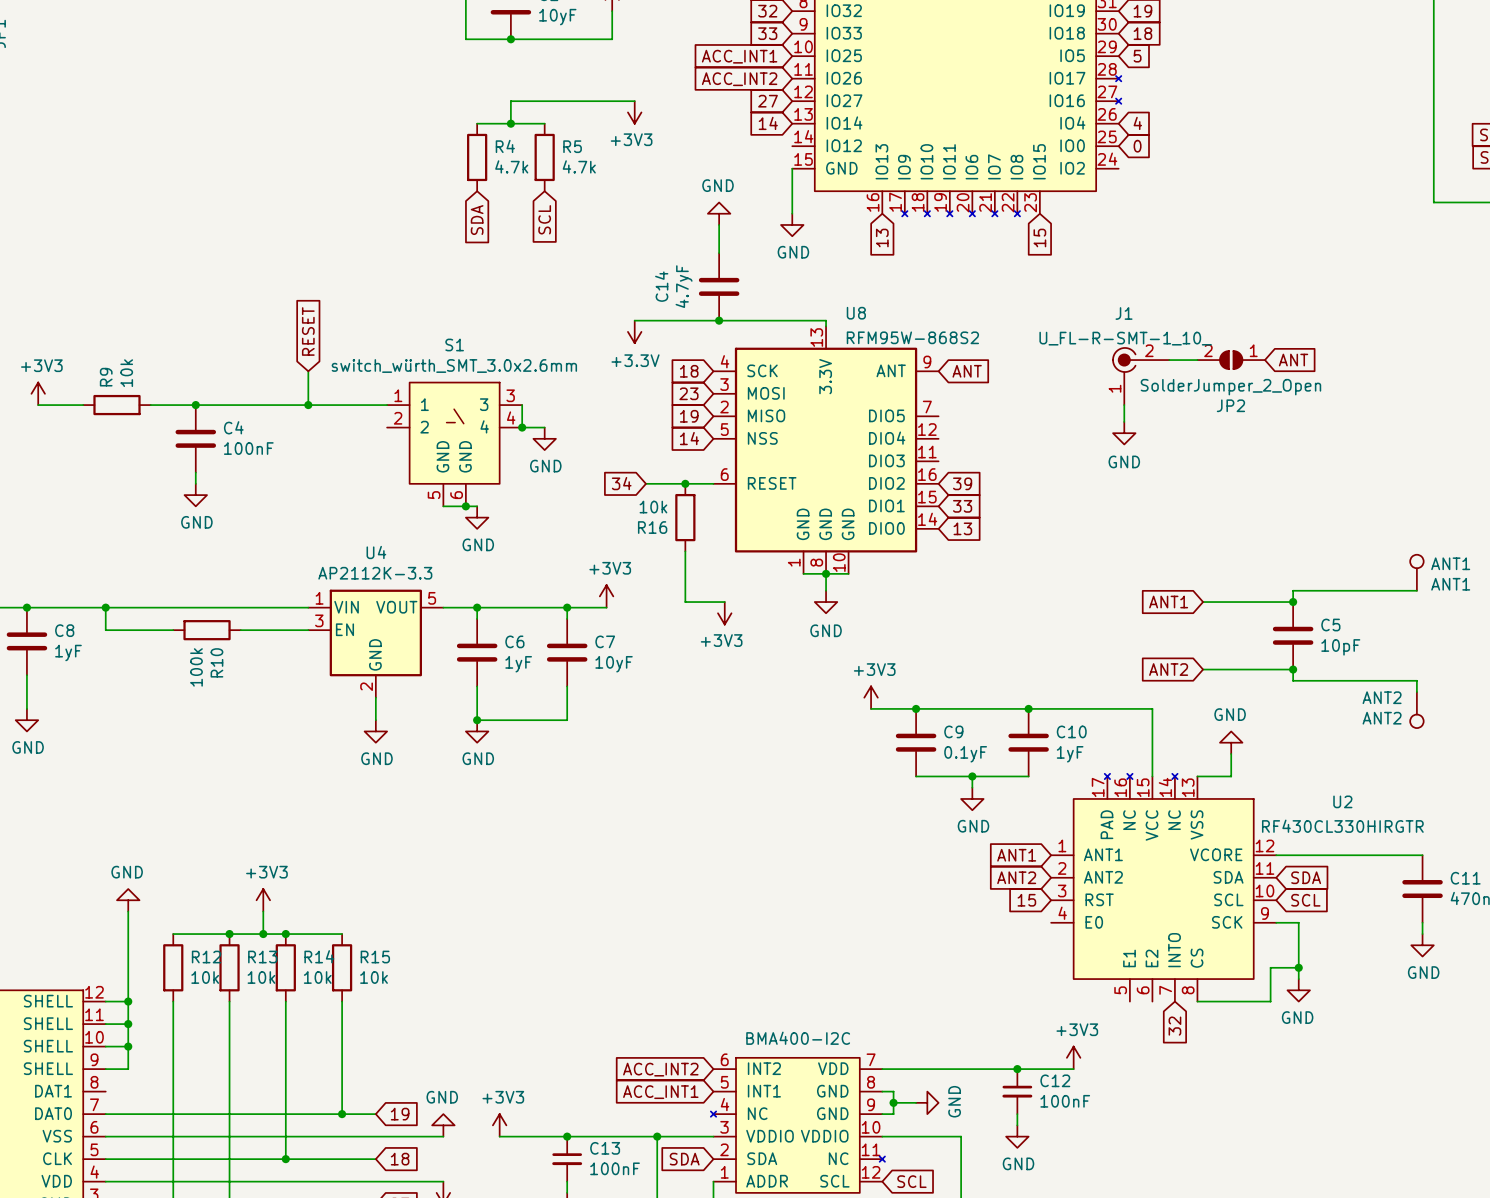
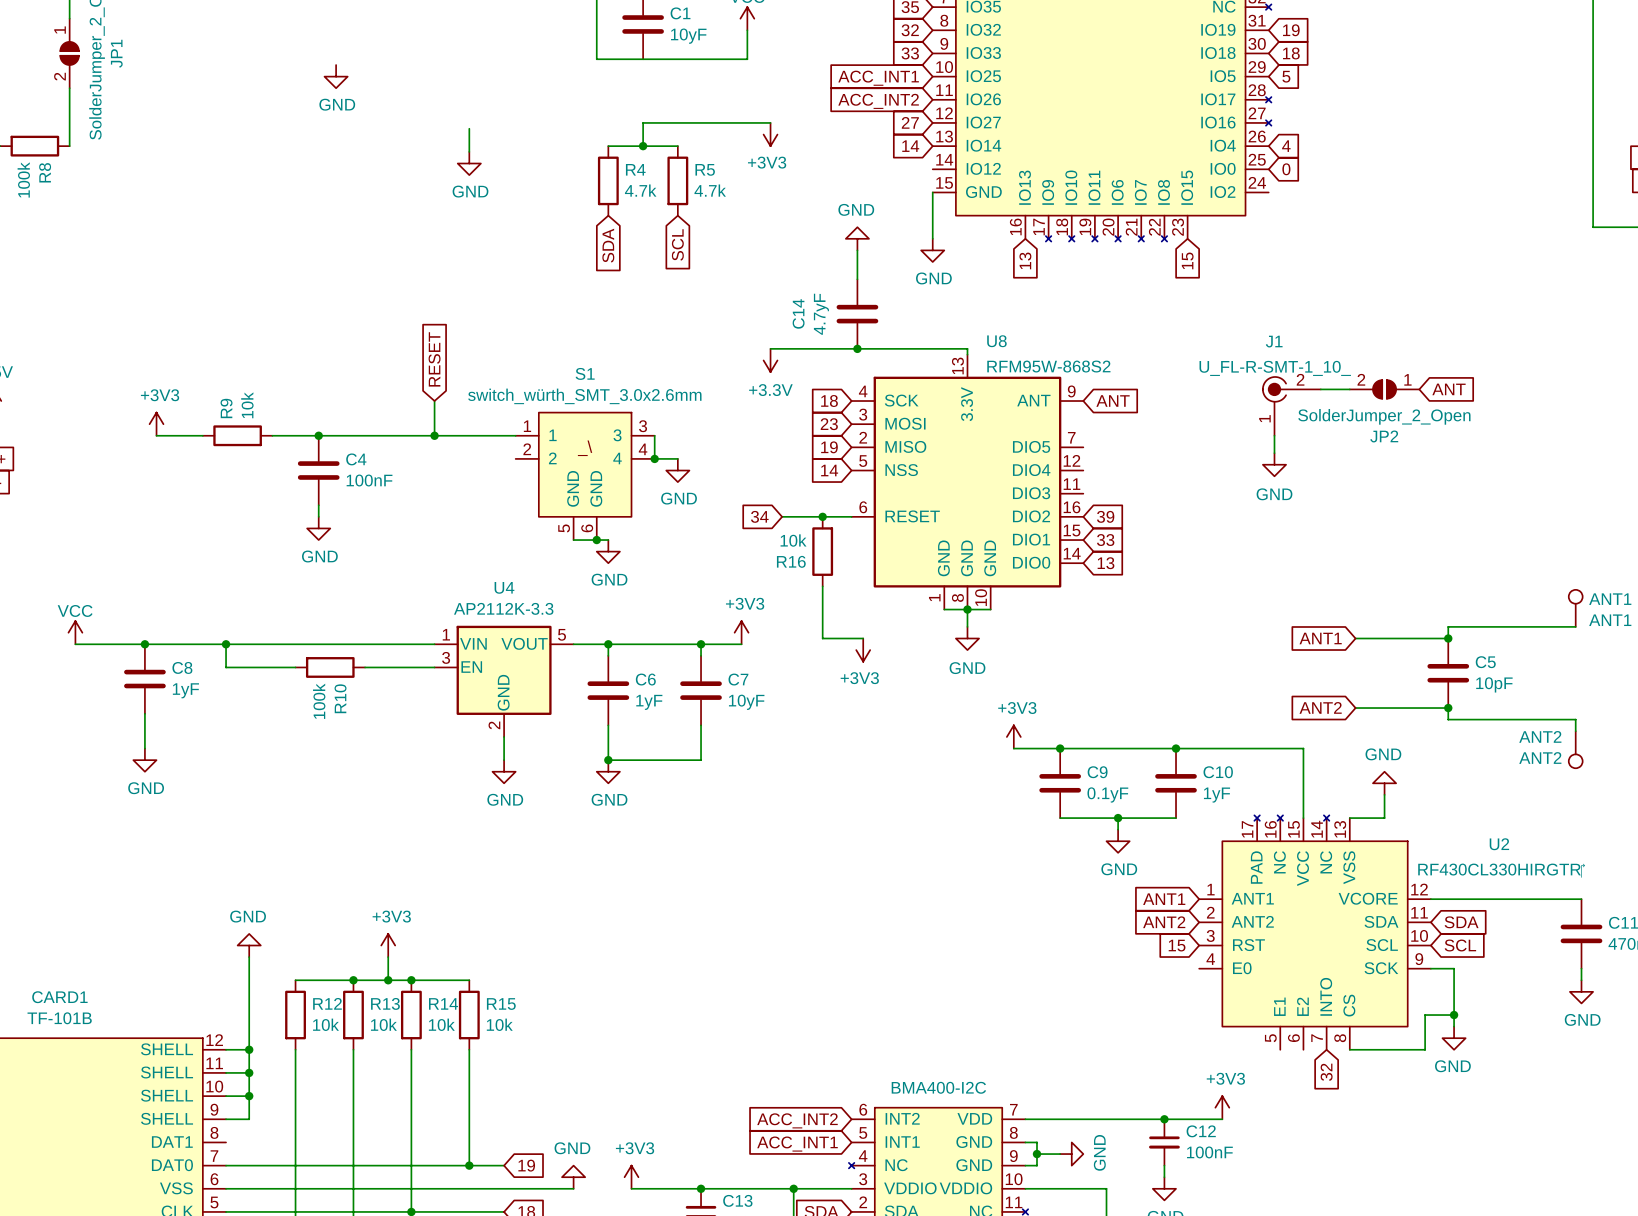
junction: (510, 39) -> none
power symbol: none -> GND (336, 76)
wire: none -> (469, 128) (469, 151)
power symbol: none -> GND (469, 163)

